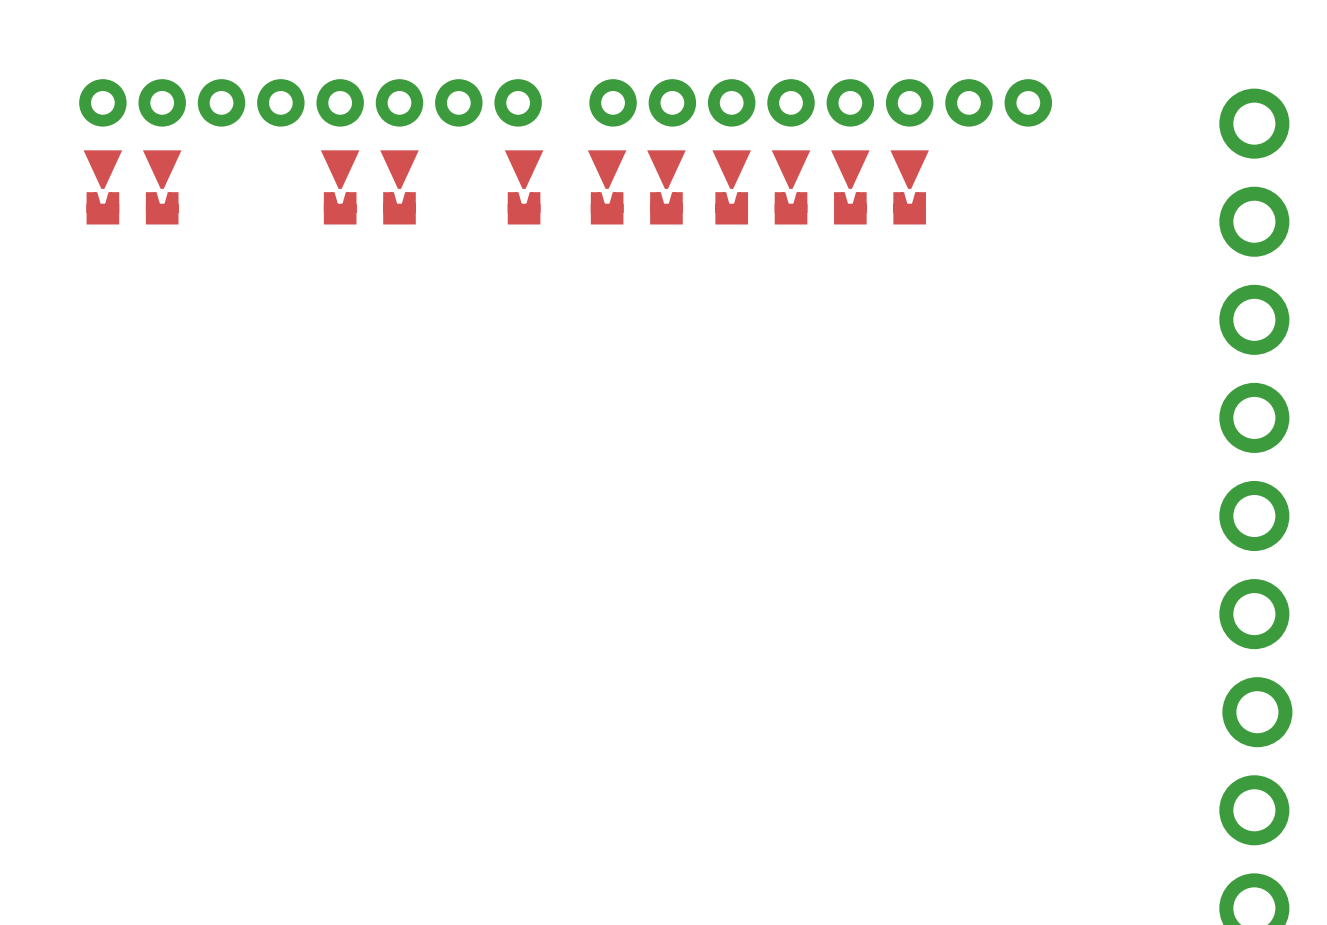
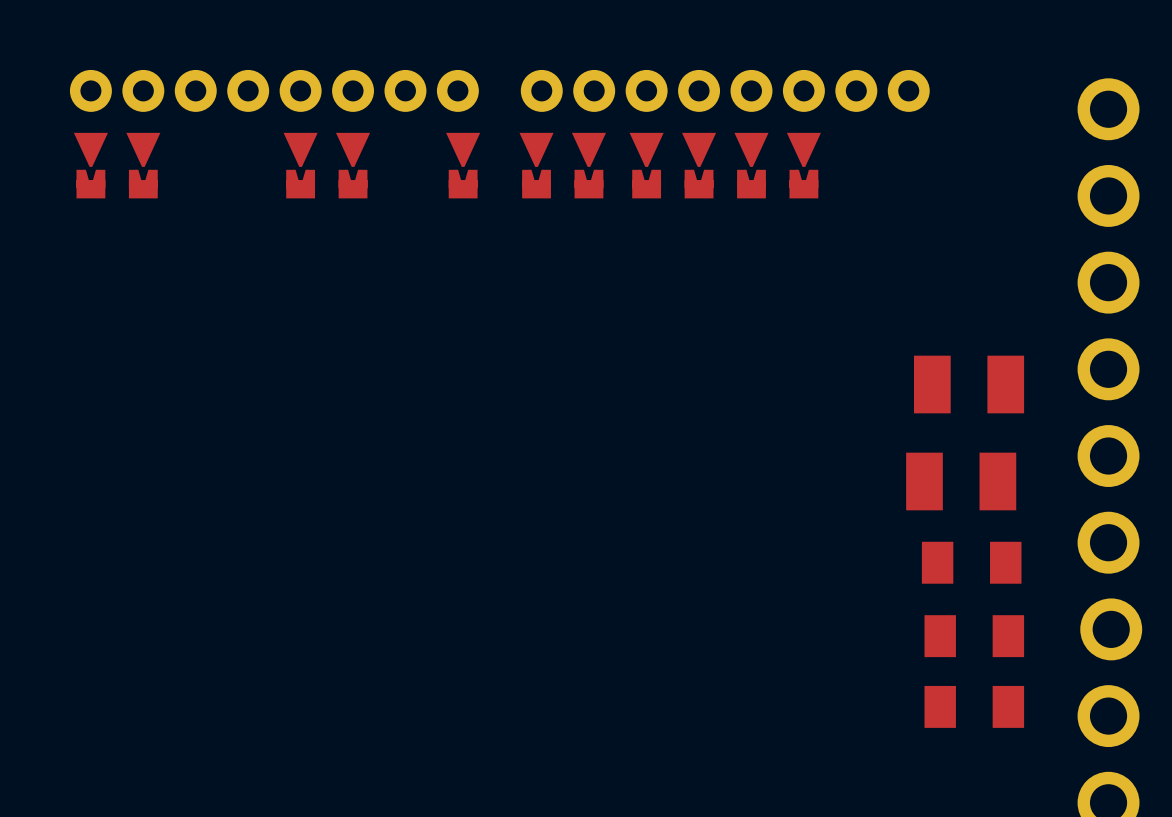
part: none -> (969, 384)
part: none -> (961, 481)
part: none -> (971, 562)
part: none -> (974, 636)
part: none -> (974, 706)

